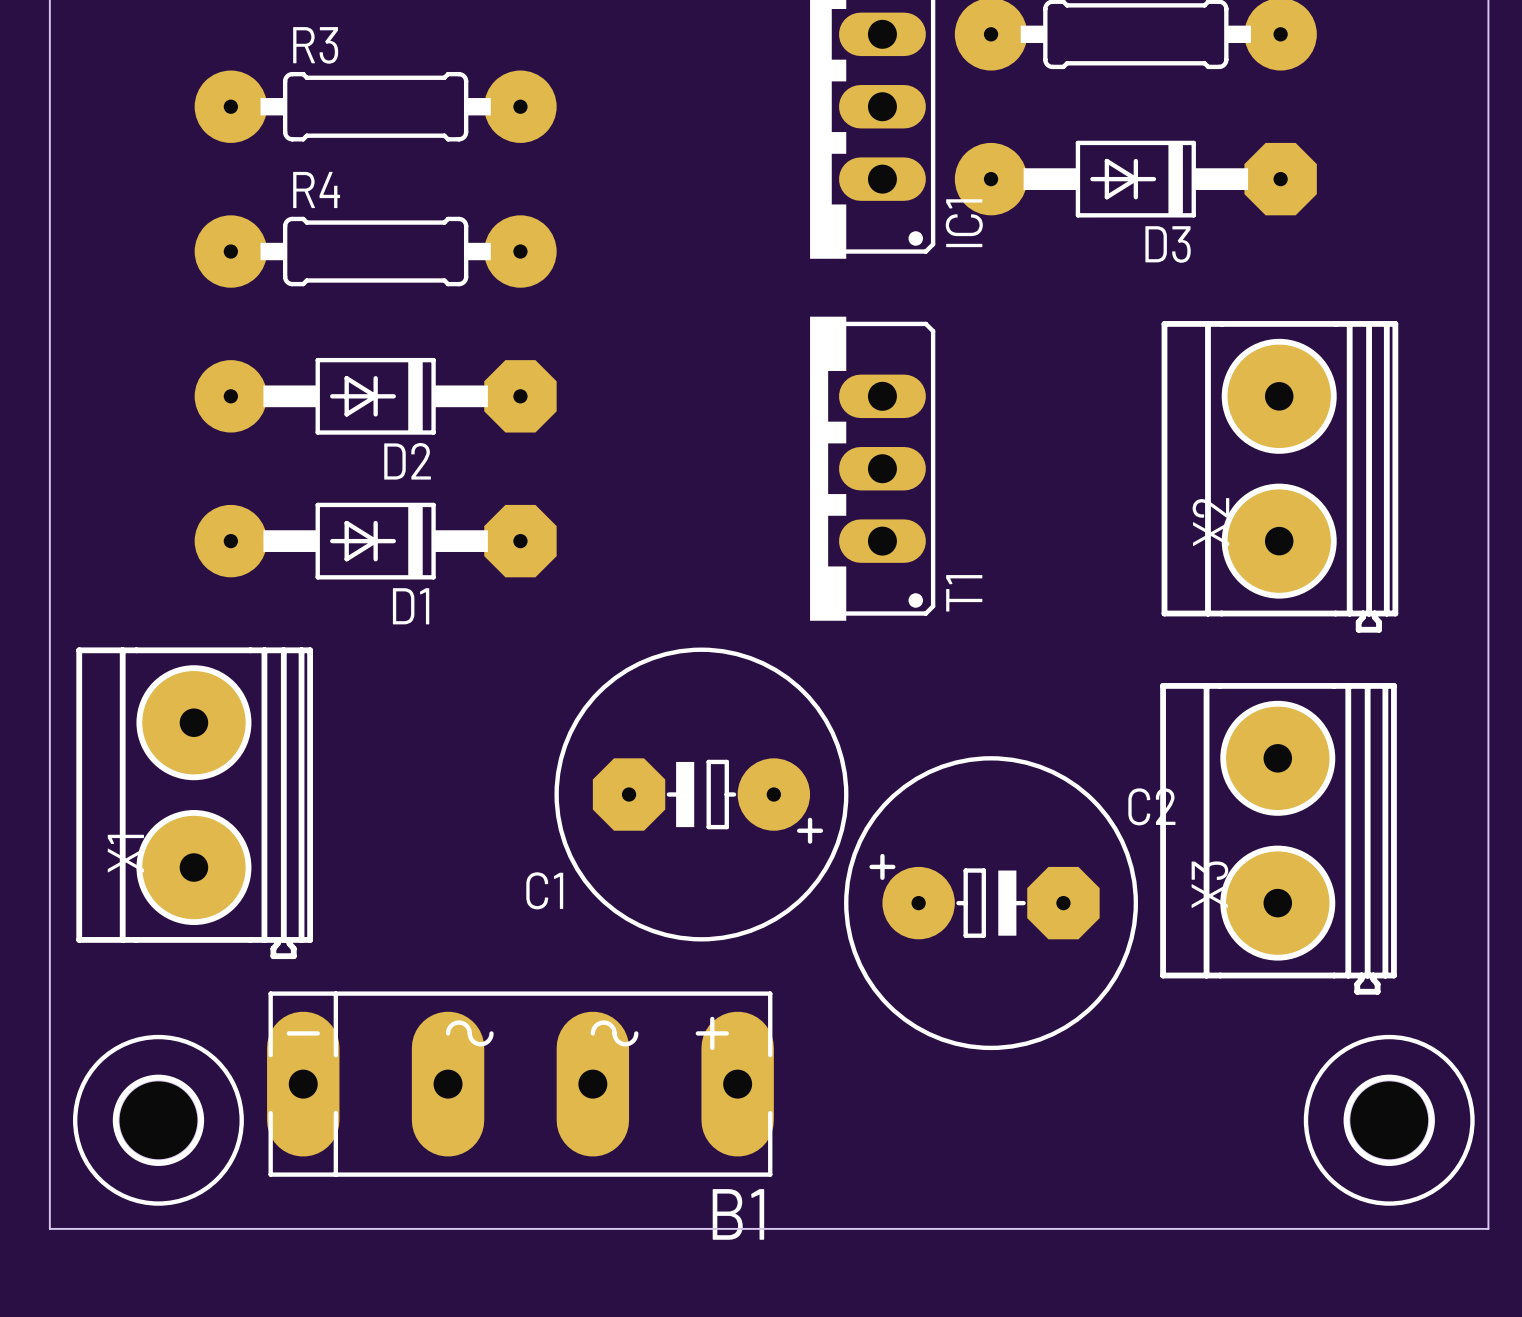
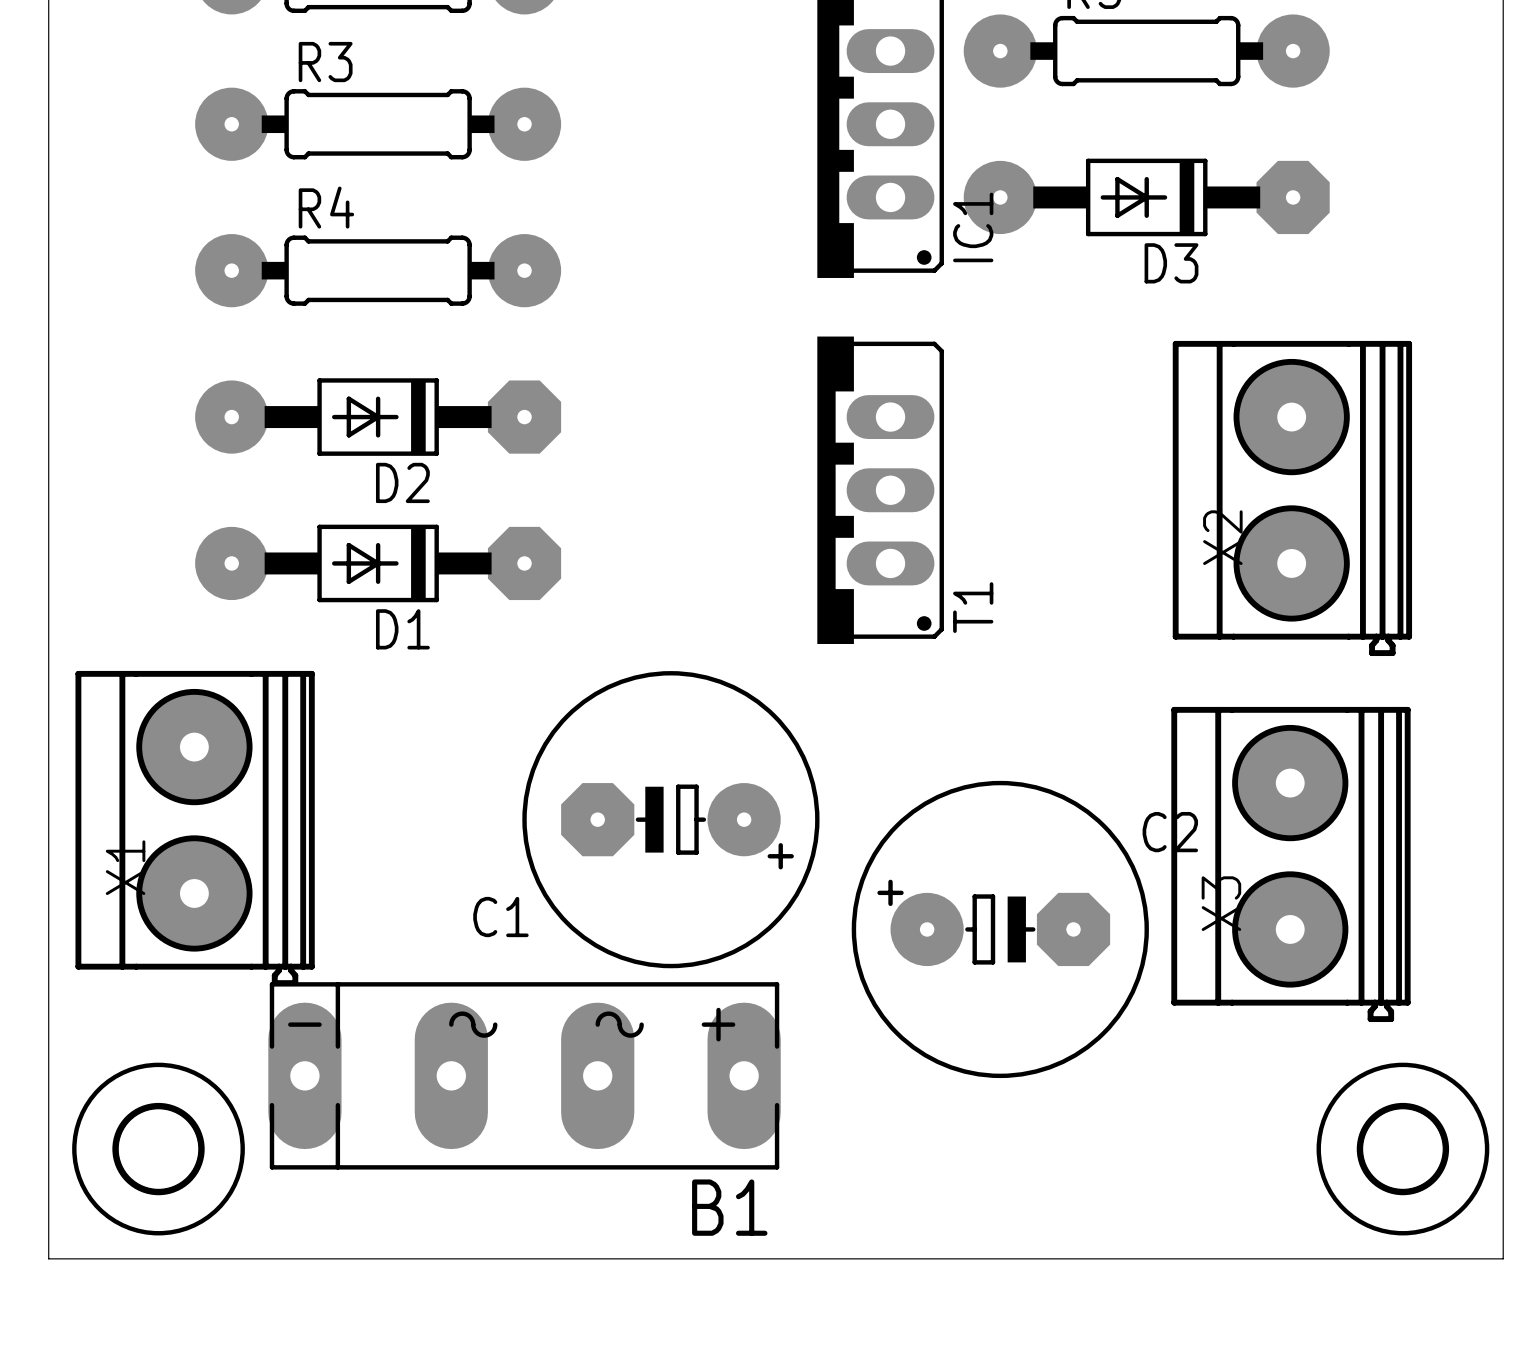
C1 position: (701, 794) -> (670, 819)
B1 position: (520, 1084) -> (524, 1075)

